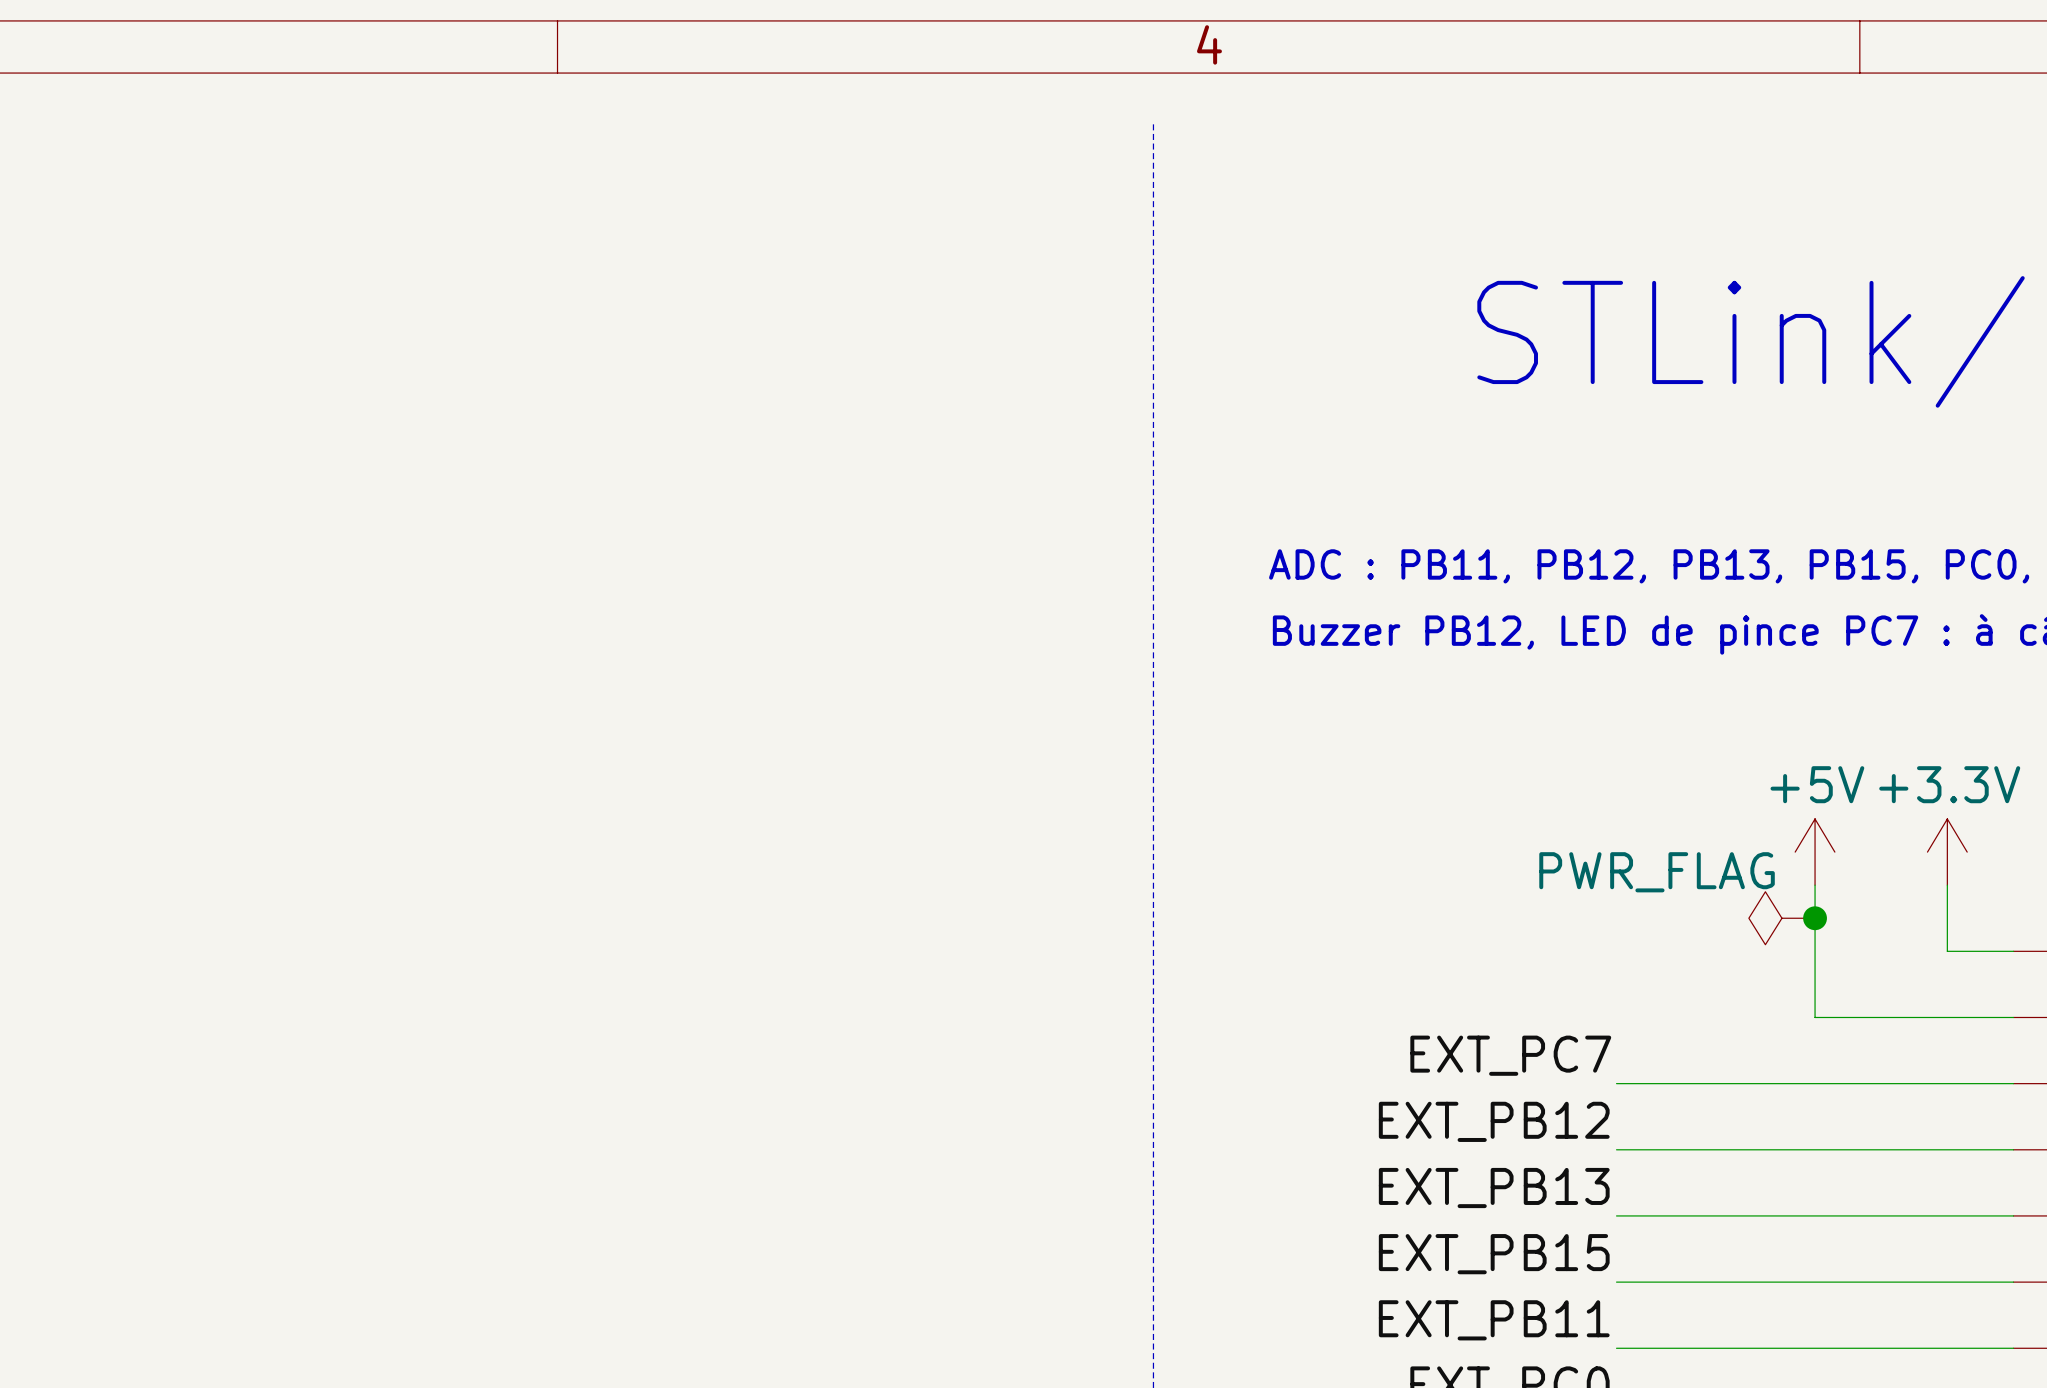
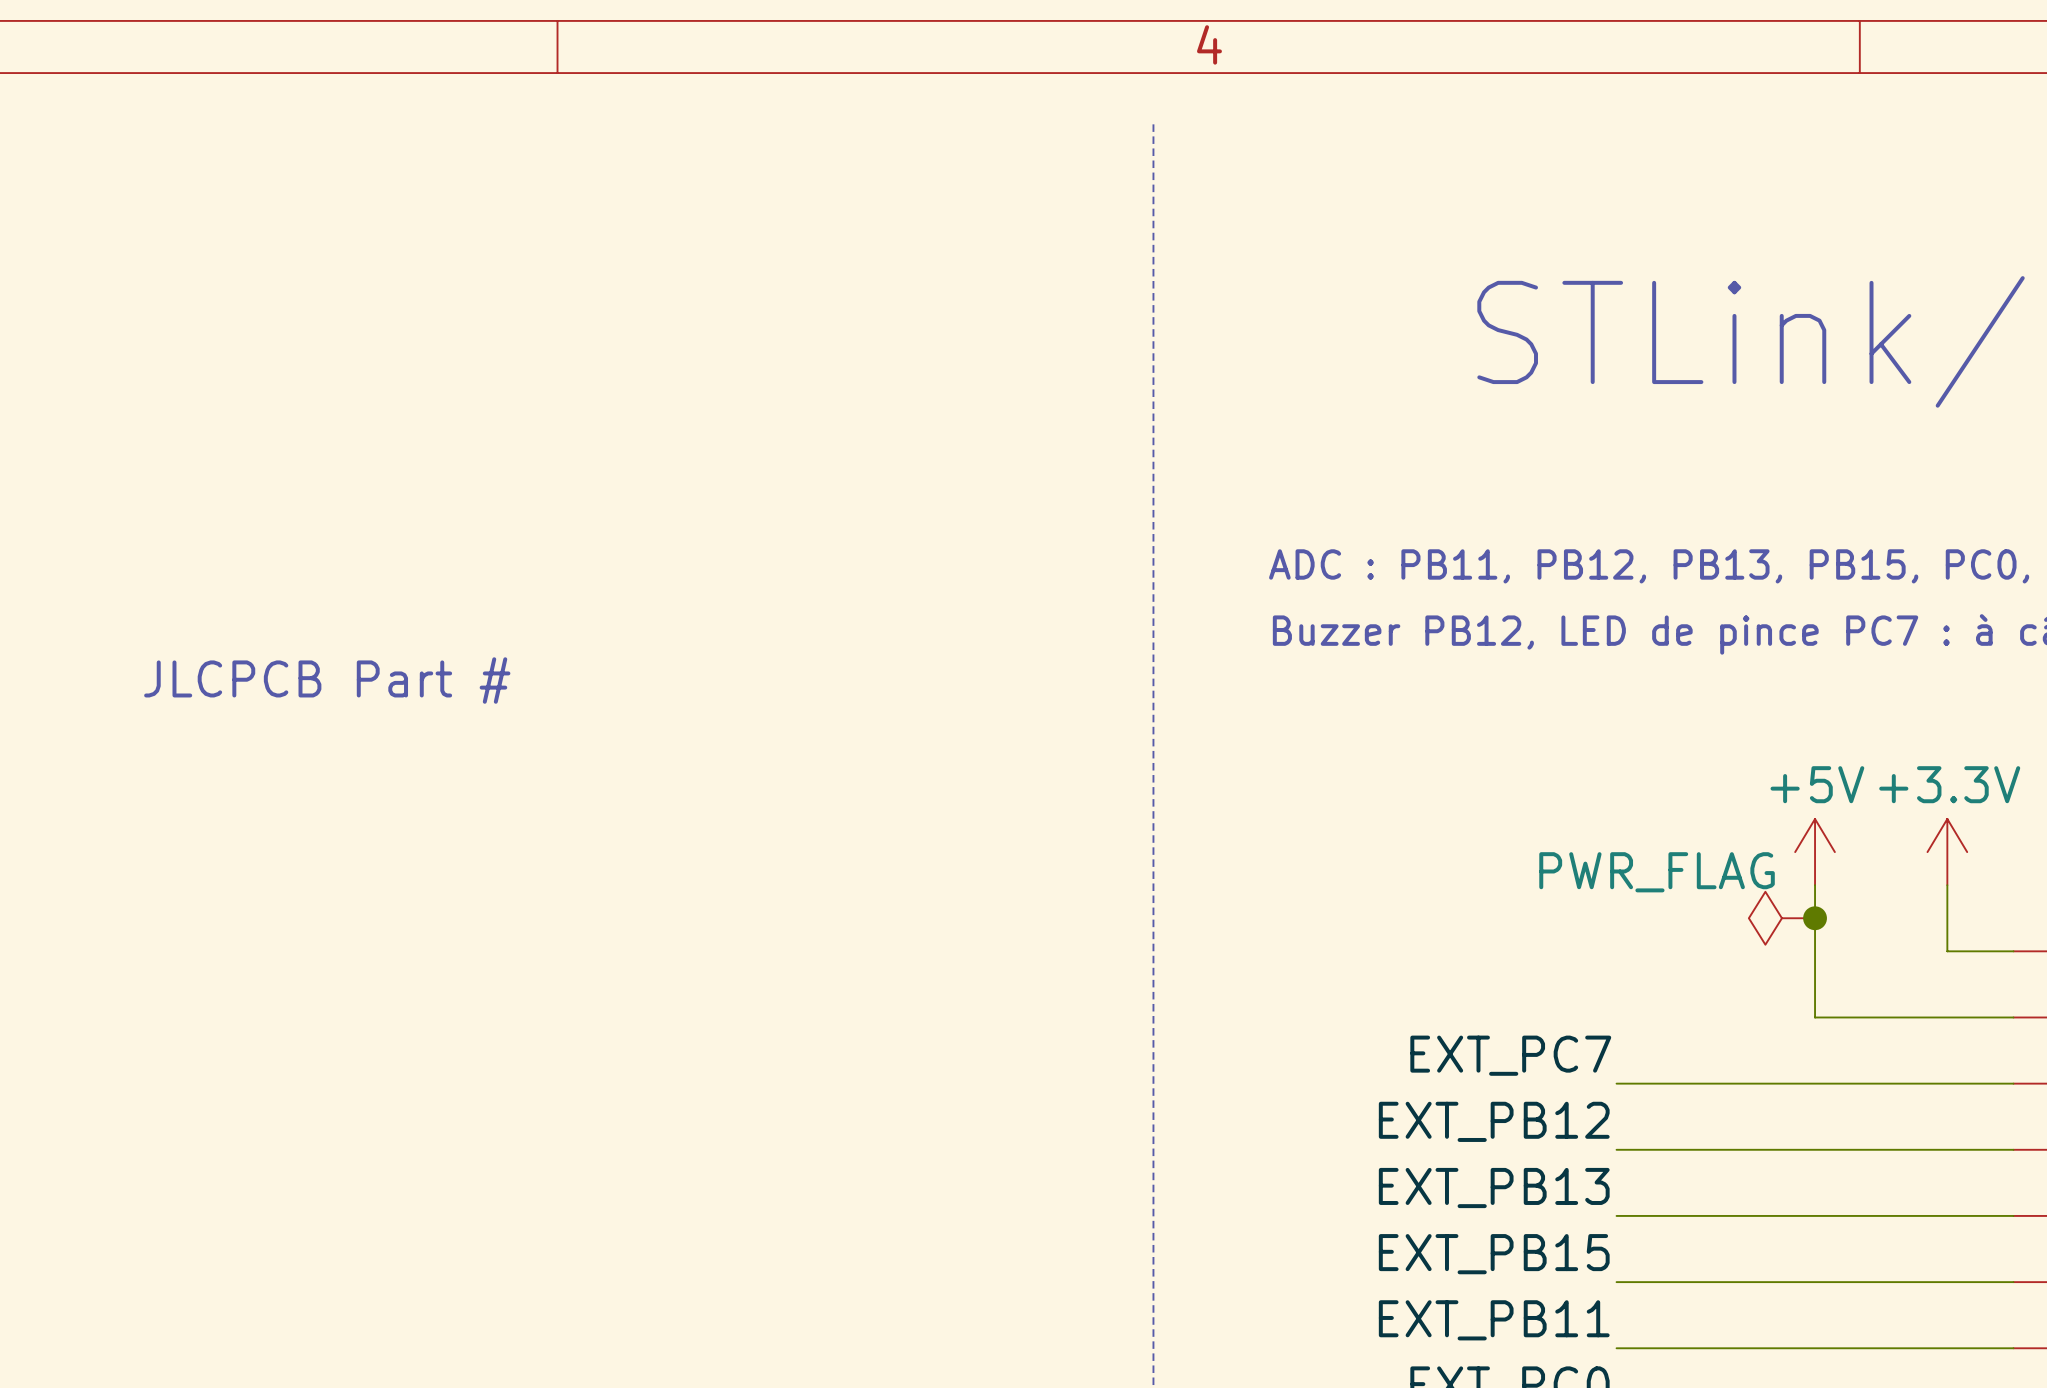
text: none -> JLCPCB Part # (327, 680)

